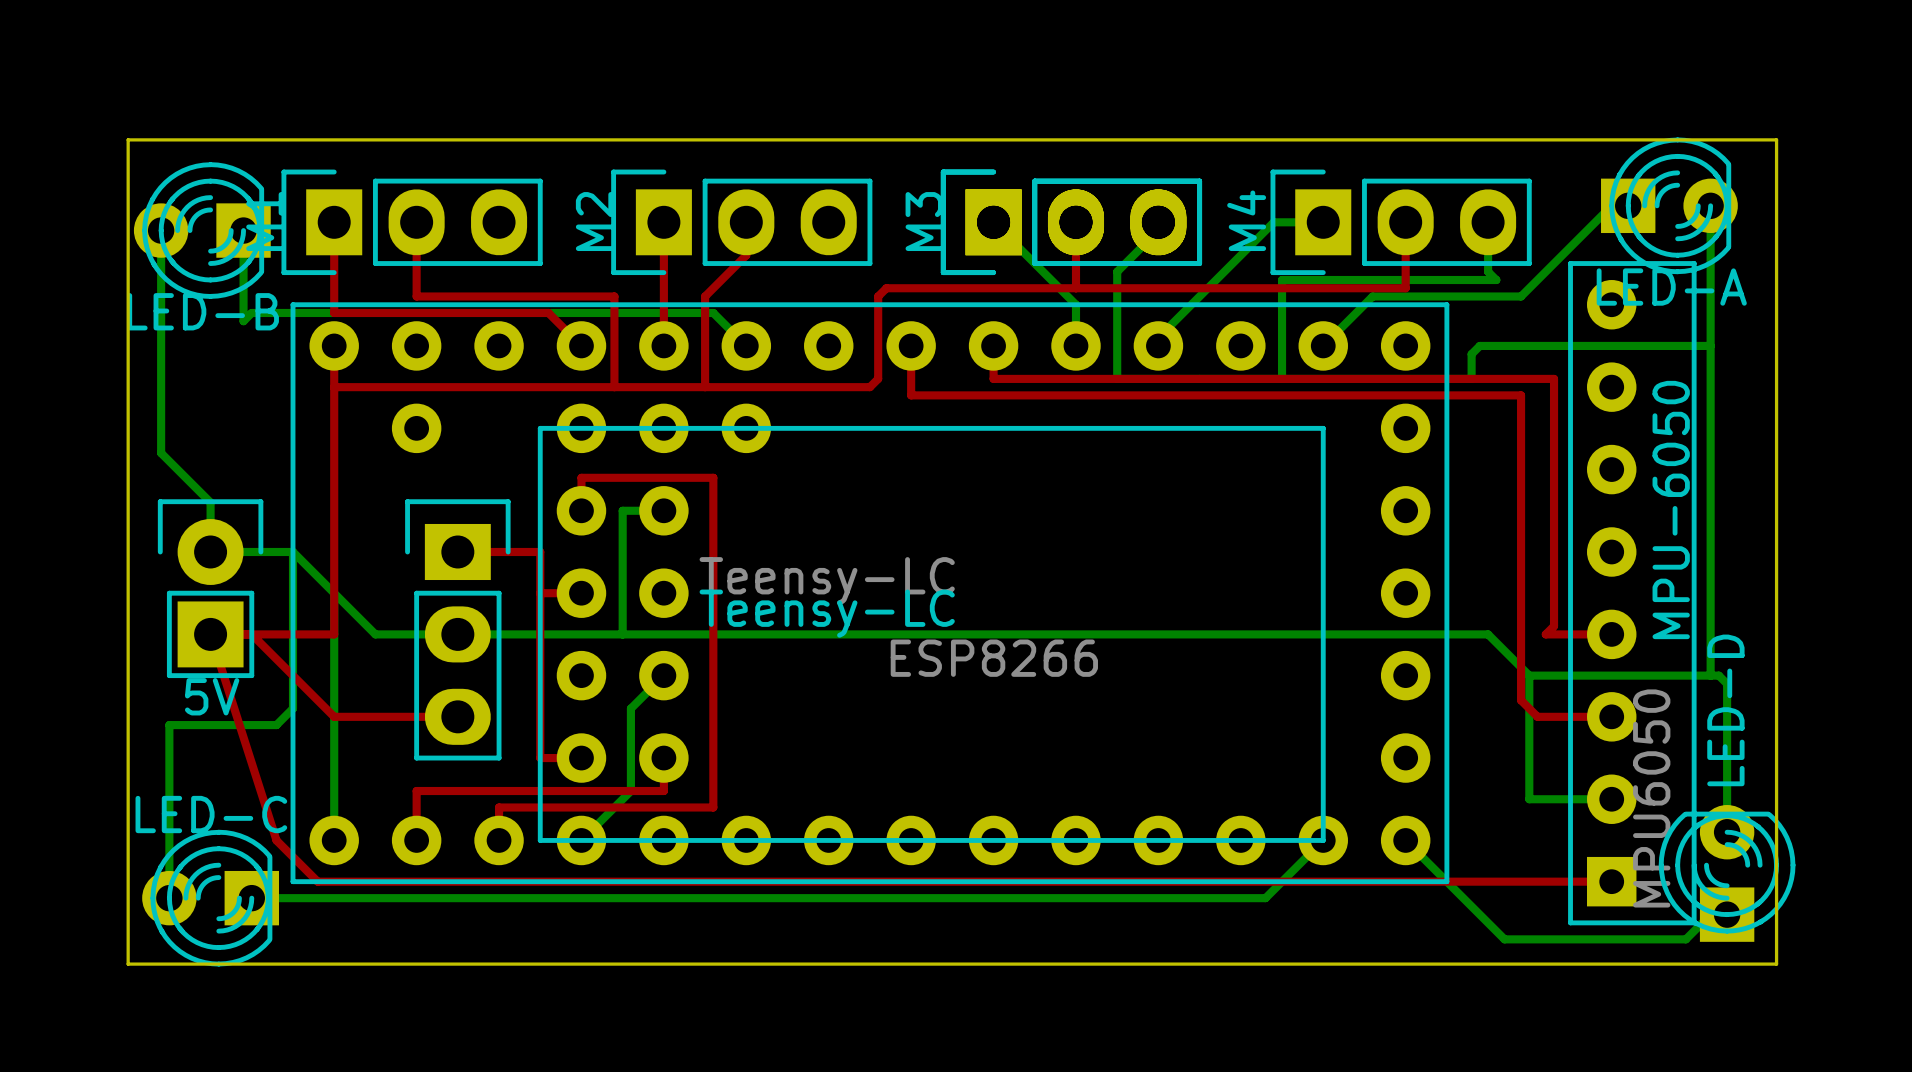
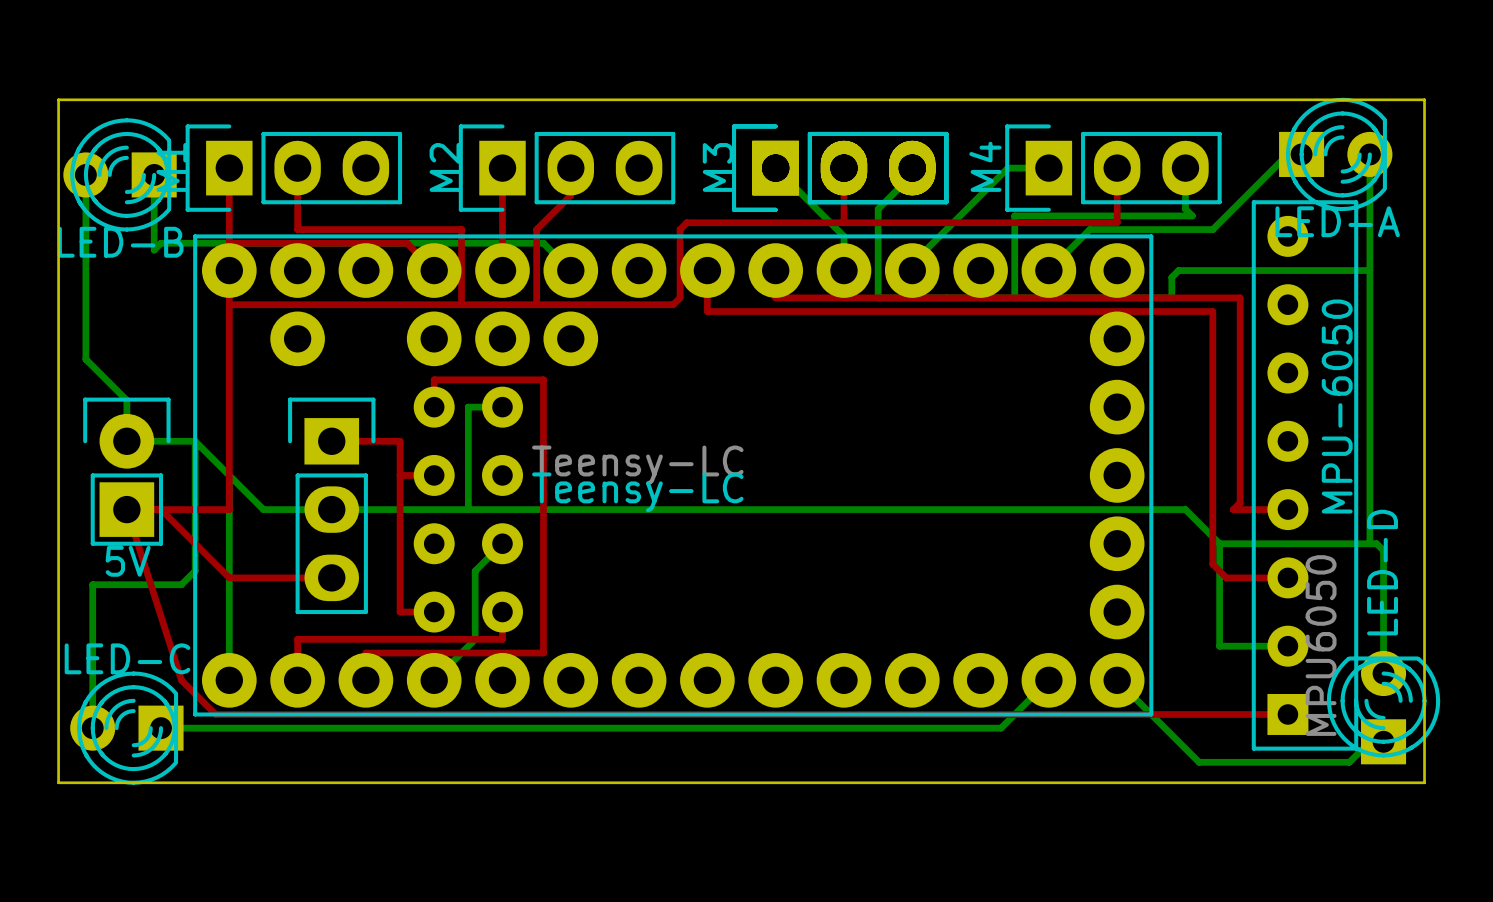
Teensy-LC footprint: [290, 302, 1450, 885] -> [193, 234, 1154, 717]
part side: top (931, 634) -> bottom (468, 509)

